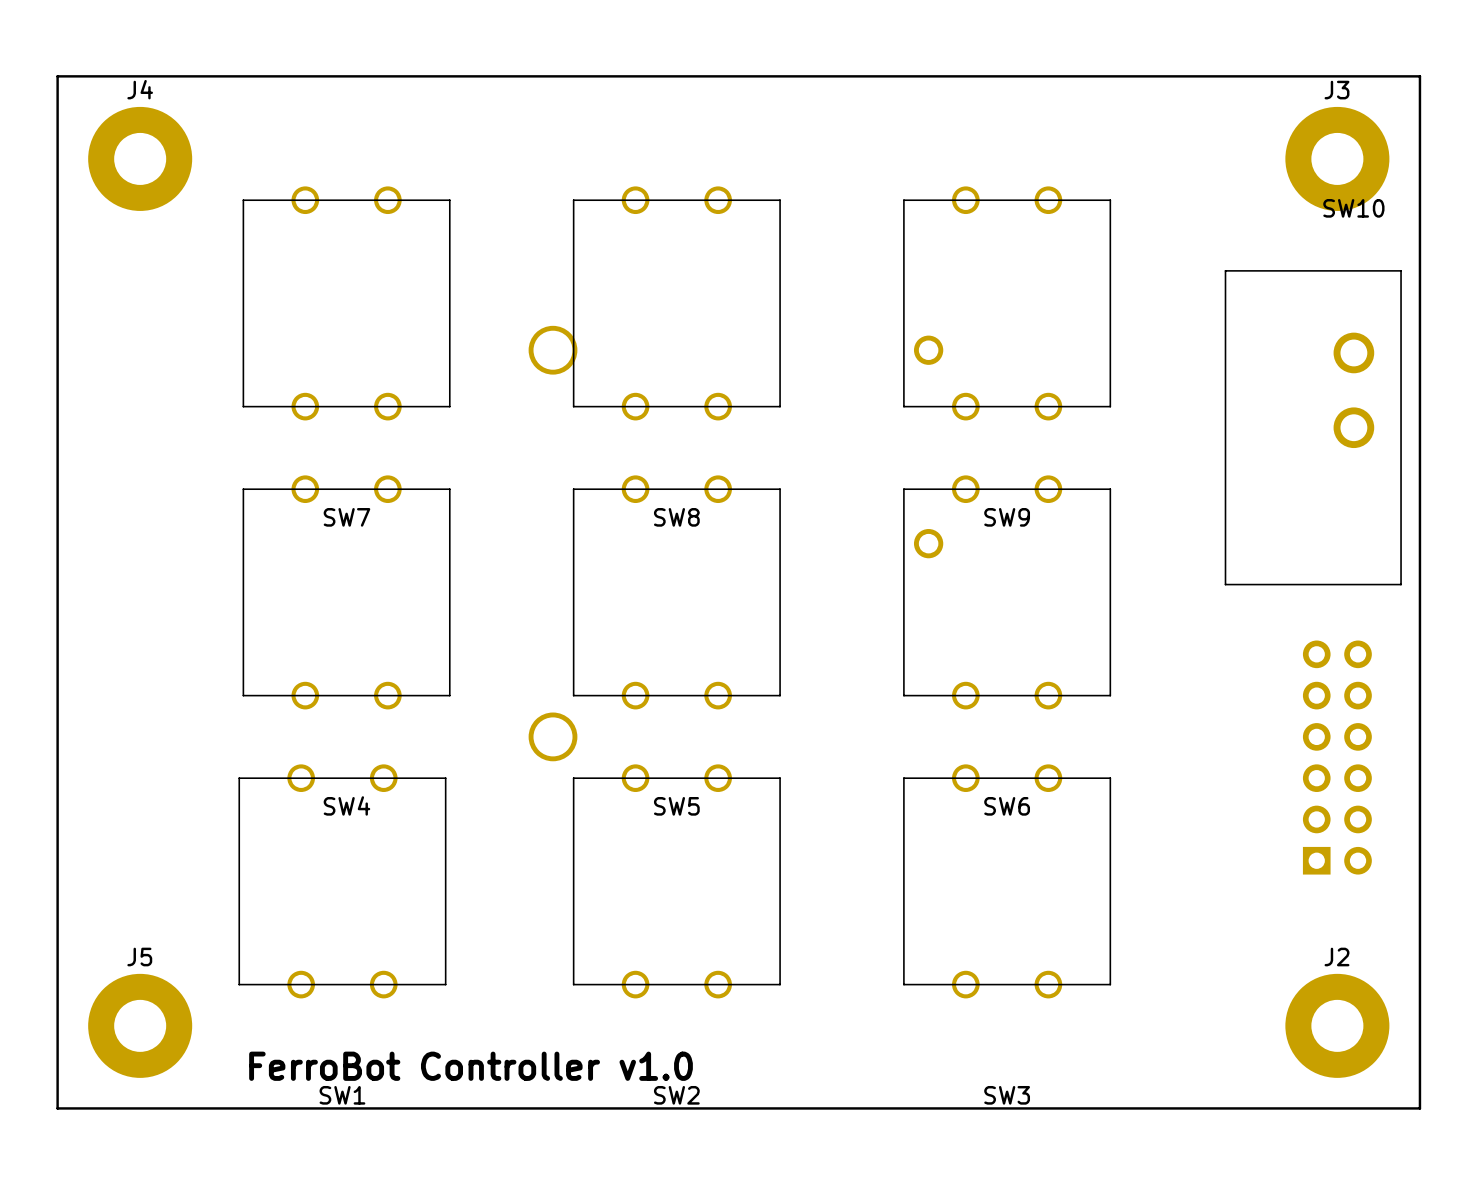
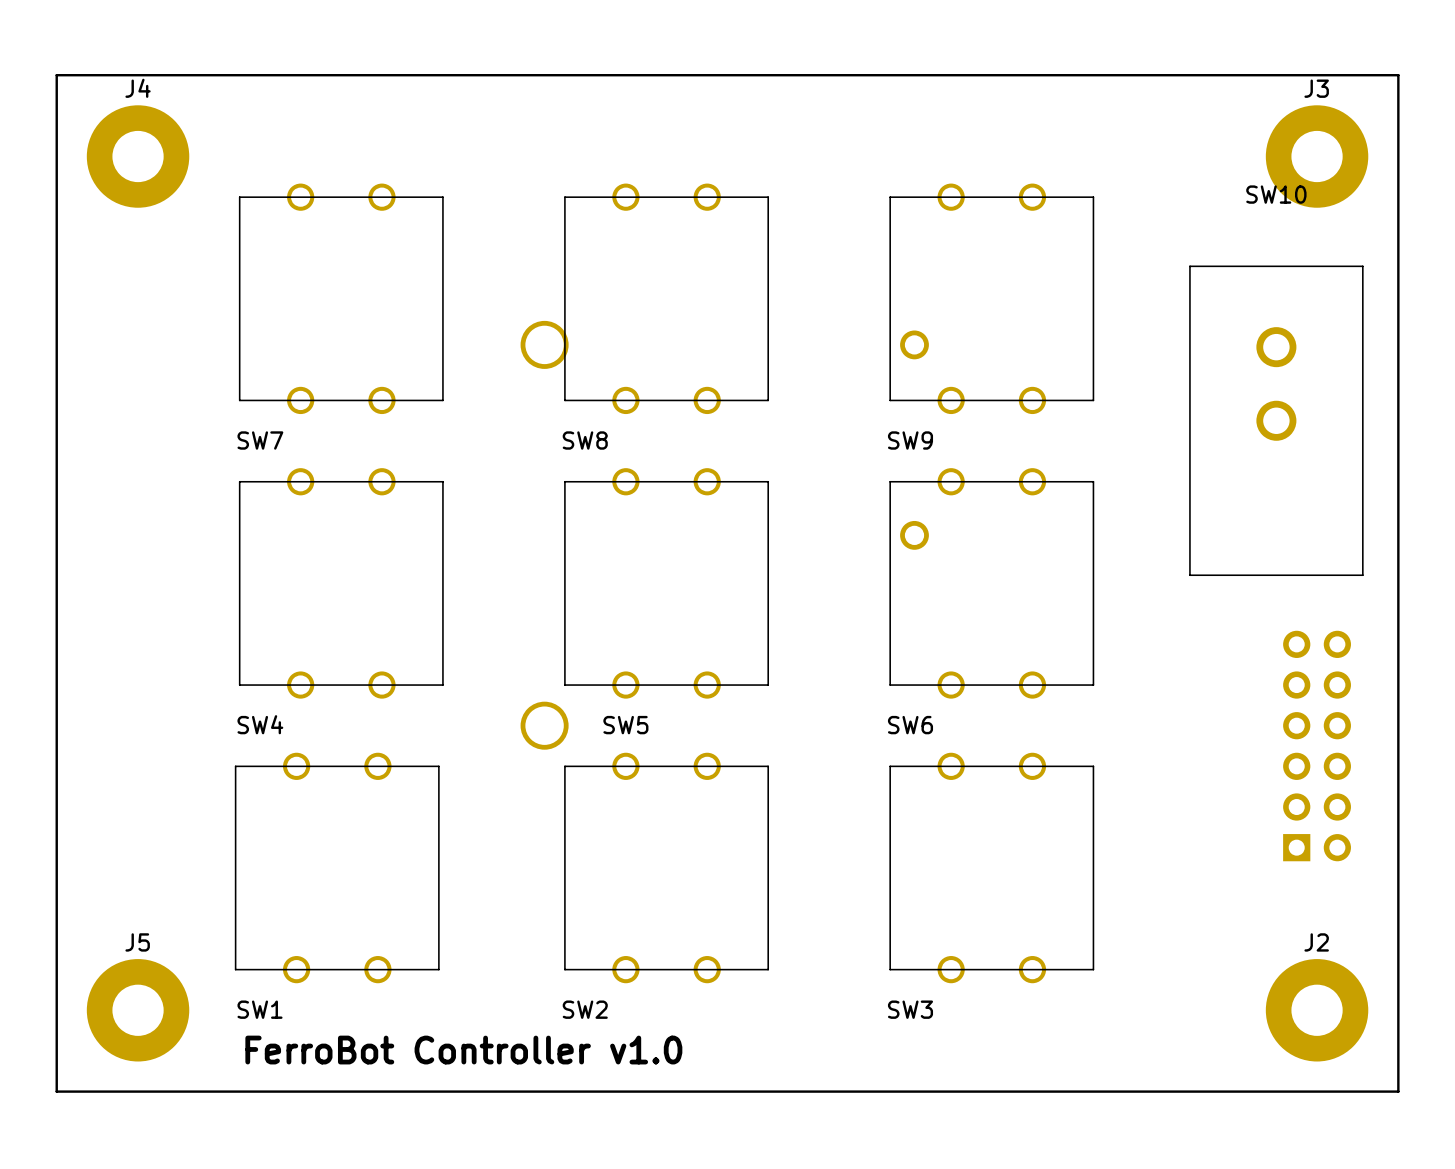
SW10 name position: SW10 (1353, 208) -> SW10 (1276, 194)
SW10 footprint: [1224, 270, 1402, 586] -> [1189, 265, 1364, 577]
SW7 name position: SW7 (346, 517) -> SW7 (260, 440)
SW8 name position: SW8 (676, 517) -> SW8 (585, 440)
SW9 name position: SW9 (1007, 517) -> SW9 (910, 440)
SW4 name position: SW4 (346, 805) -> SW4 (260, 724)
SW5 name position: SW5 (676, 806) -> SW5 (625, 725)
SW6 name position: SW6 (1007, 806) -> SW6 (910, 725)
SW1 name position: SW1 (342, 1095) -> SW1 (260, 1009)
SW2 name position: SW2 (676, 1095) -> SW2 (585, 1009)
SW3 name position: SW3 (1007, 1095) -> SW3 (910, 1009)

